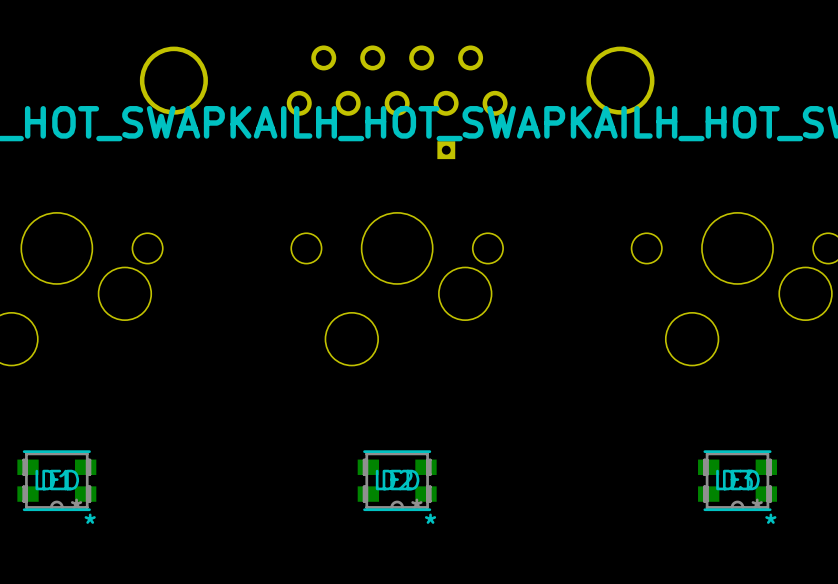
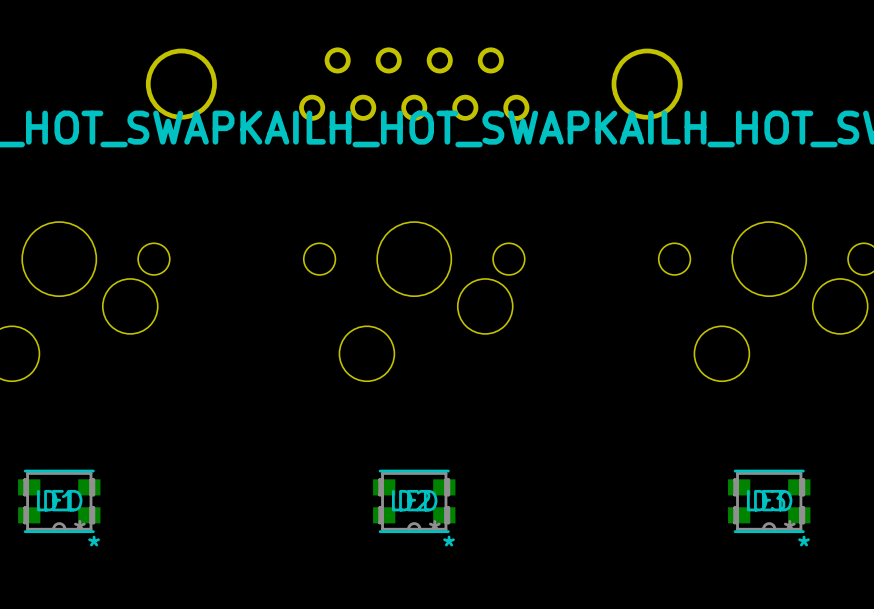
part: (446, 150) -> none

